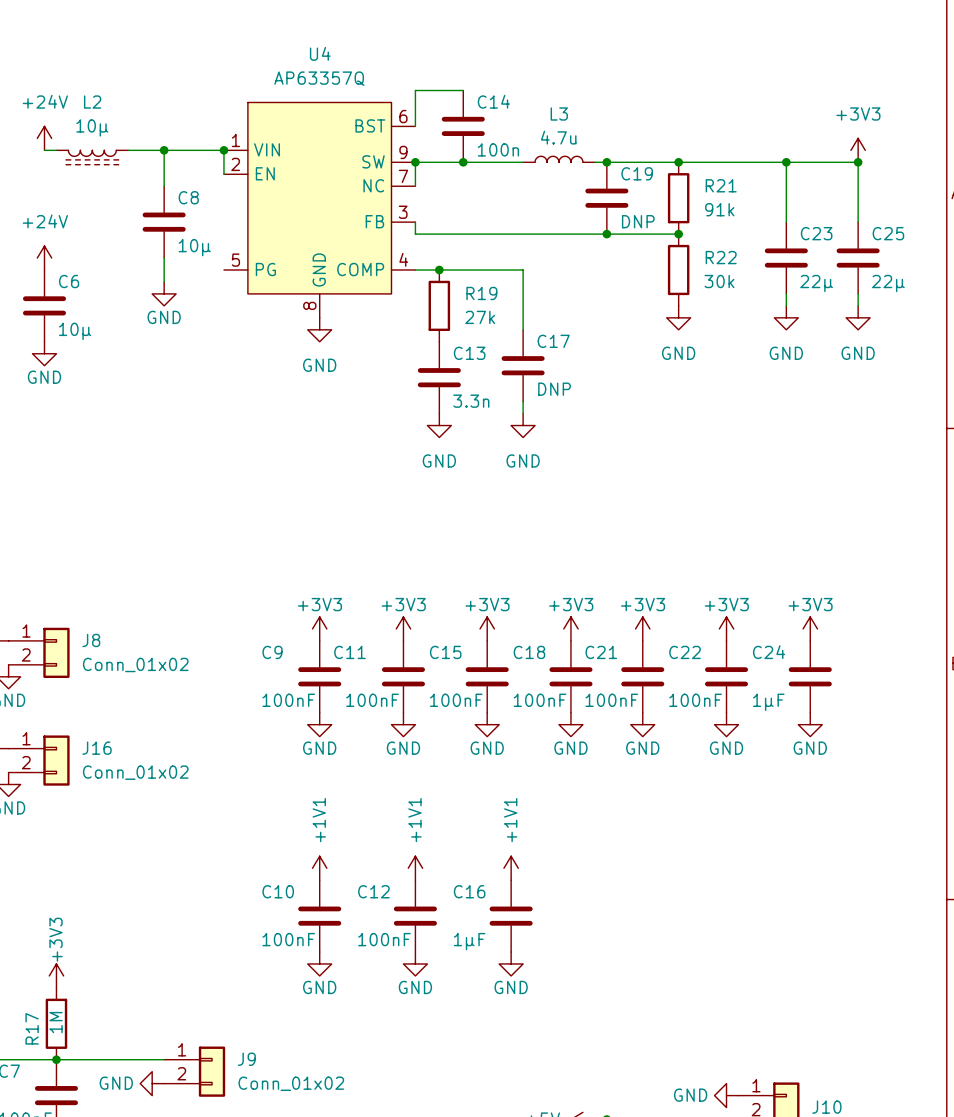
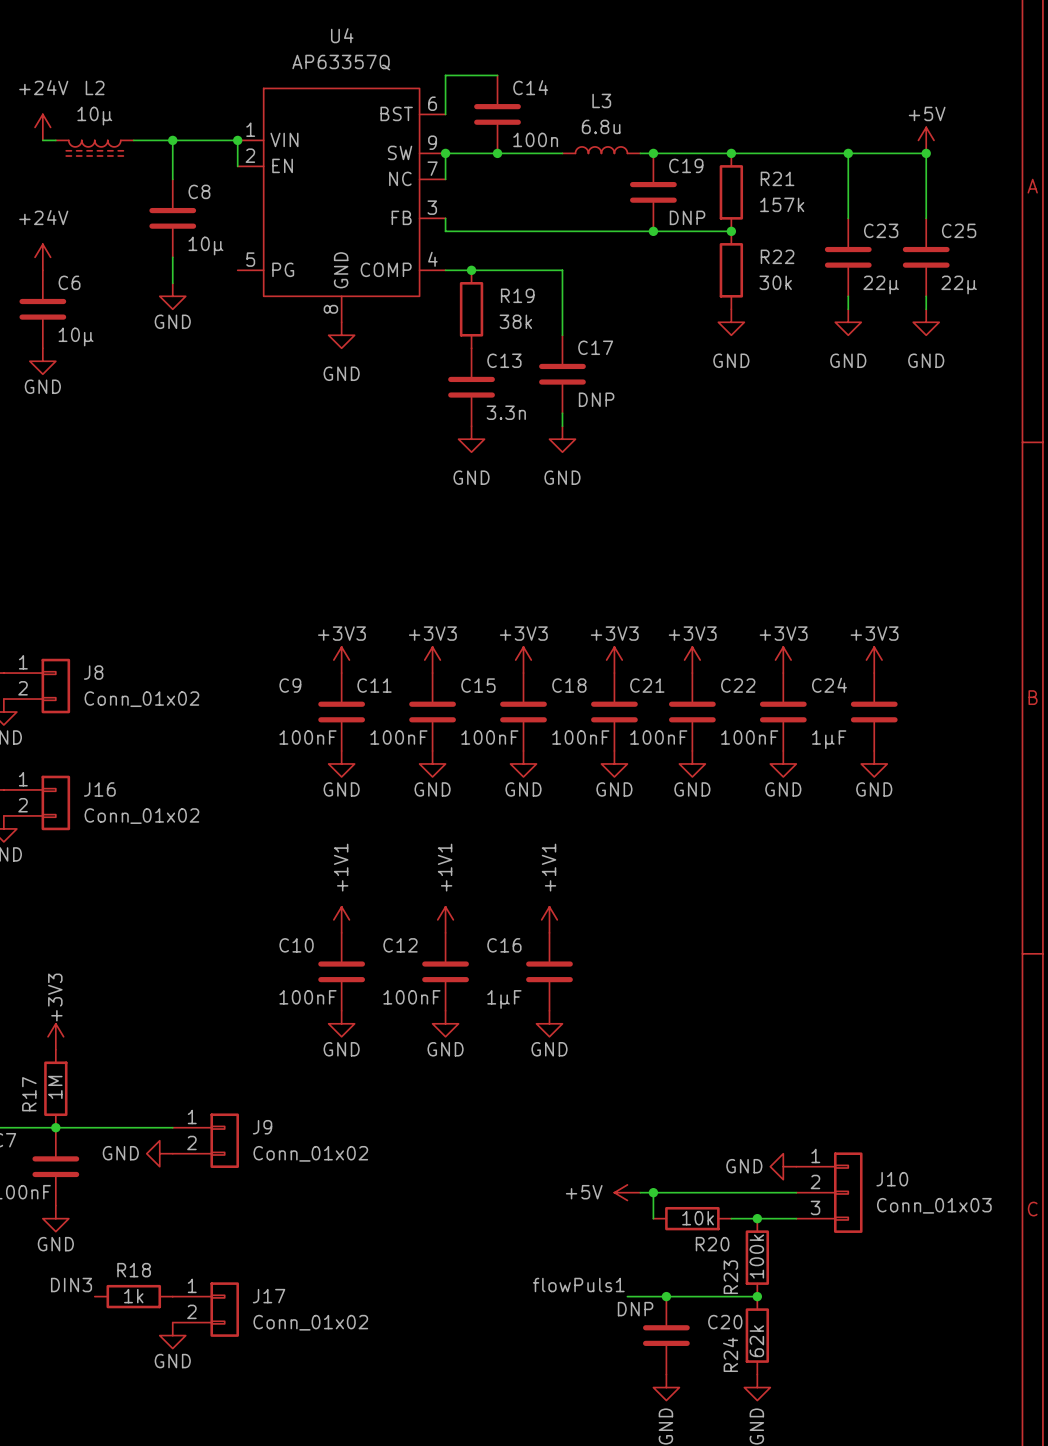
L3 value: 4.7u (558, 137) -> 6.8u (601, 126)
power symbol: +3V3 (858, 150) -> +5V (926, 140)
R21 value: 91k (719, 209) -> 157k (782, 204)
R19 value: 27k (480, 317) -> 38k (515, 321)

